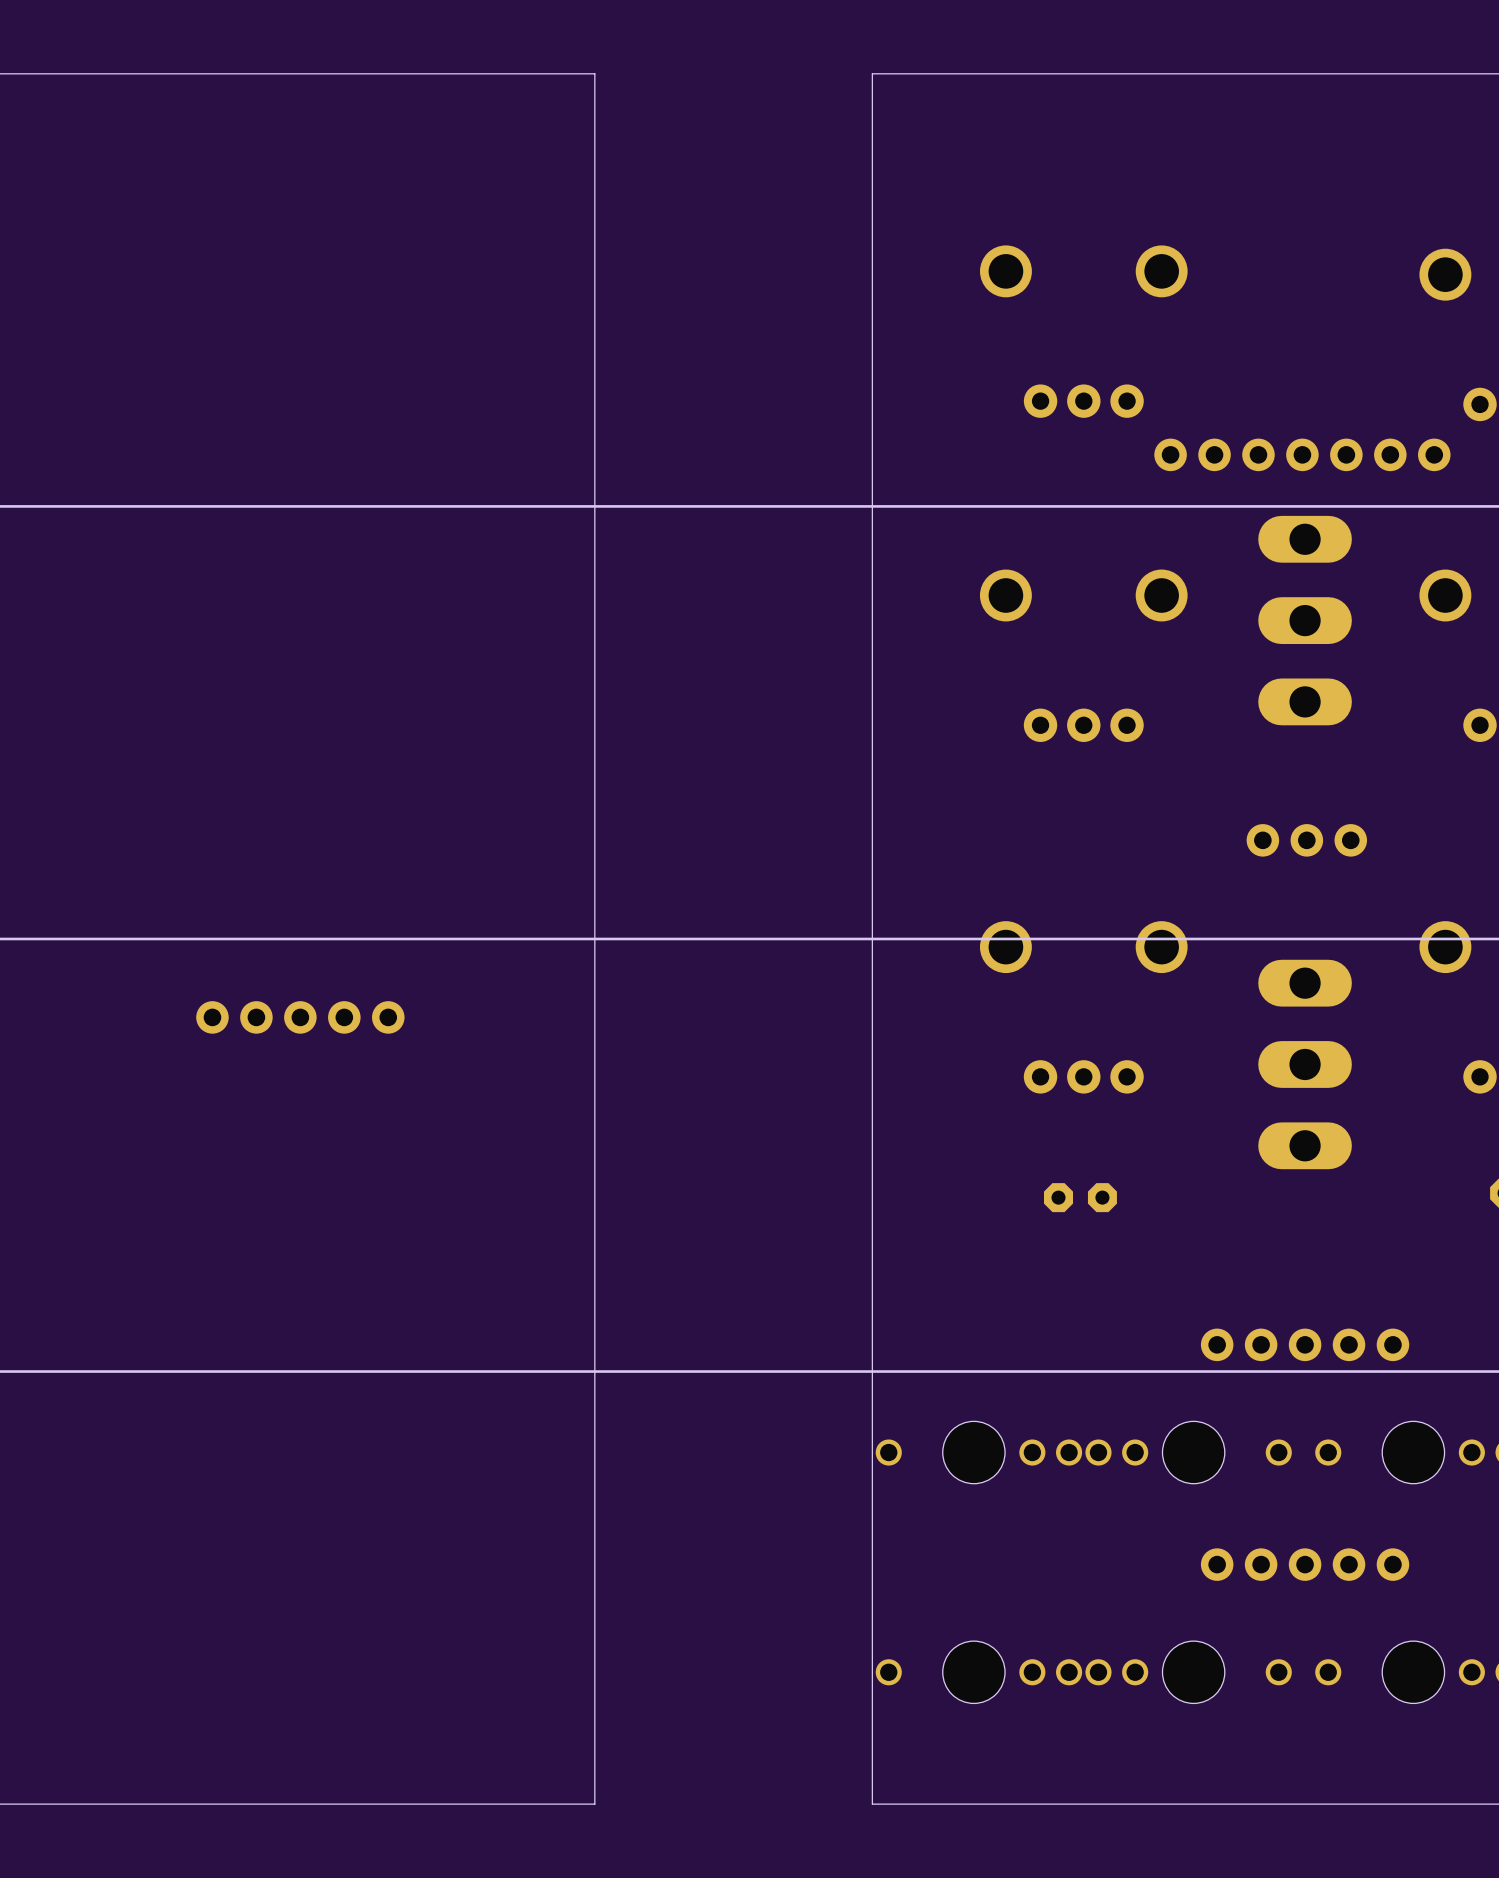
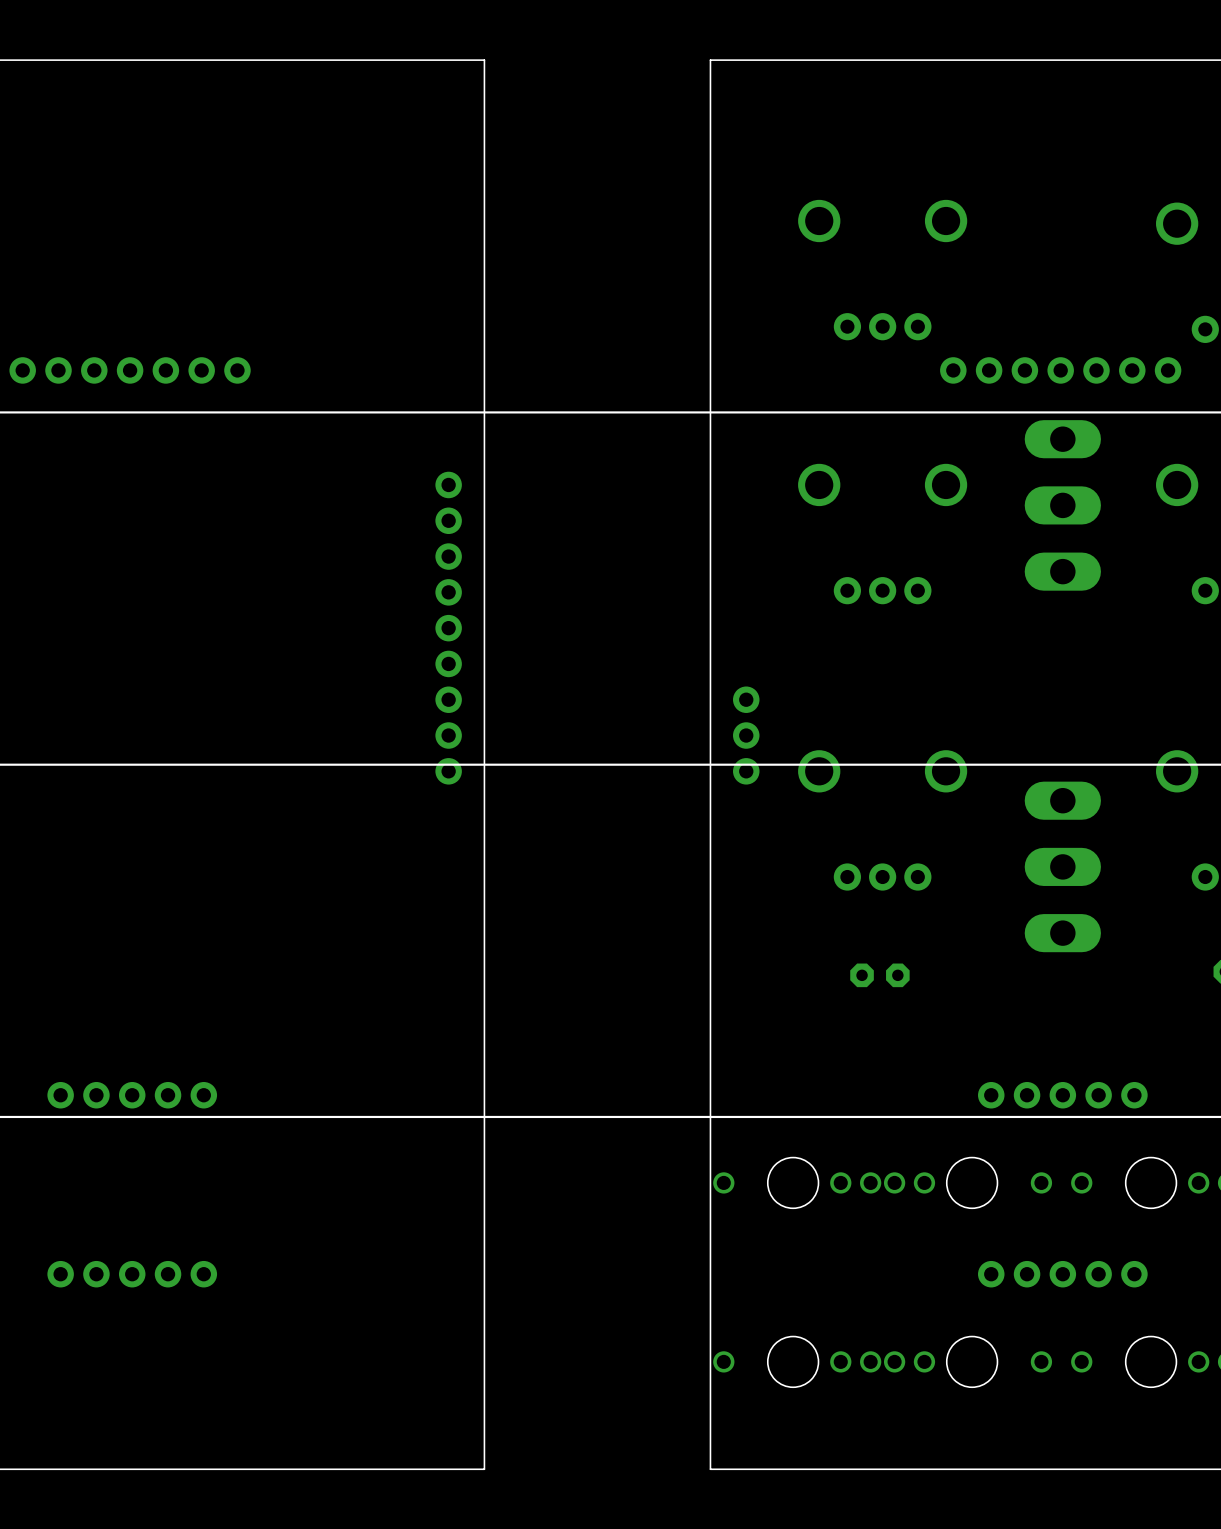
part: none -> (130, 370)
part: none -> (448, 628)
part rotation: 0° (1306, 840) -> 90° clockwise (746, 735)
part position: (1306, 840) -> (746, 735)
part: (300, 1017) -> none
part: none -> (132, 1095)
part: none -> (132, 1274)

